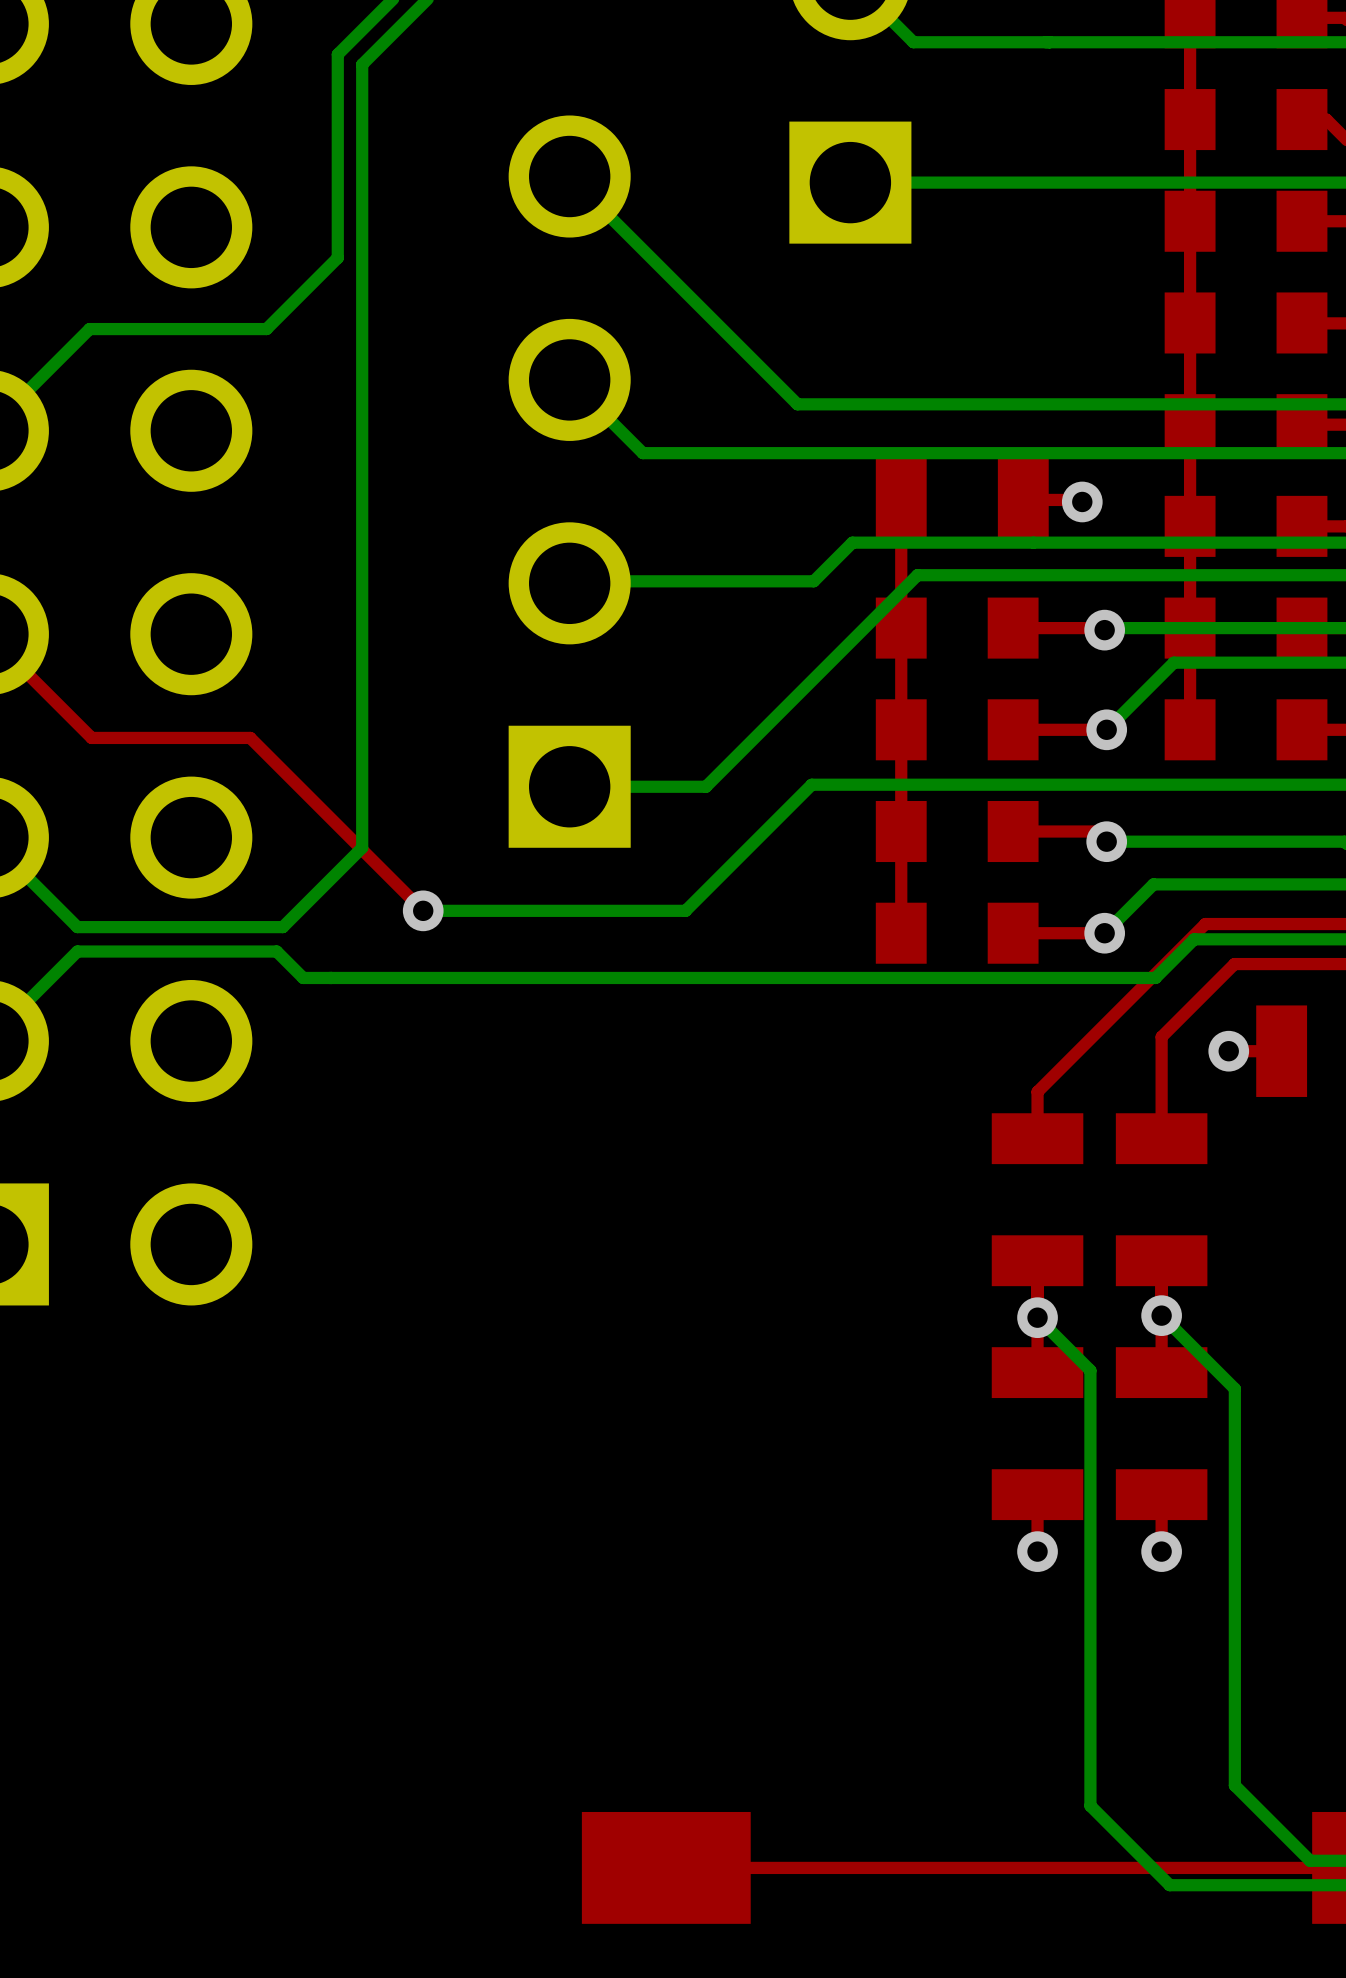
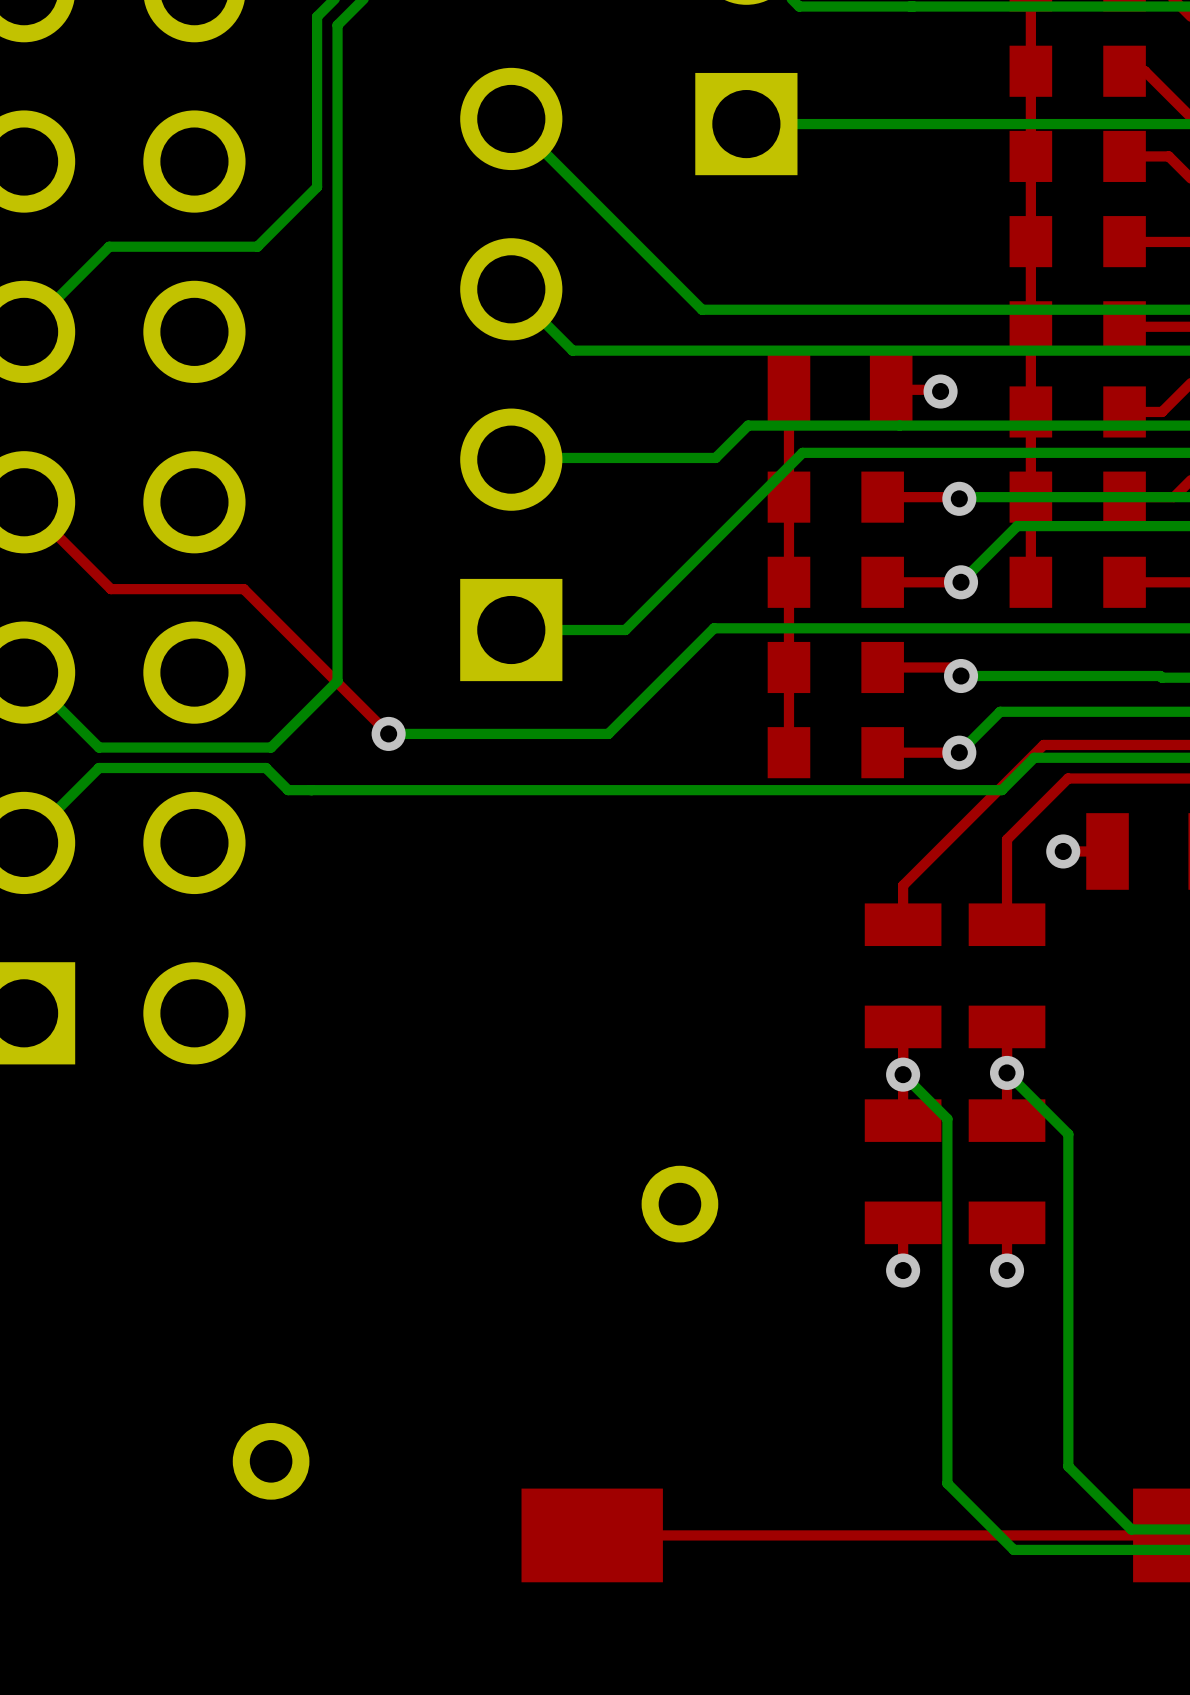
part: none -> (679, 1204)
part: none -> (271, 1461)

